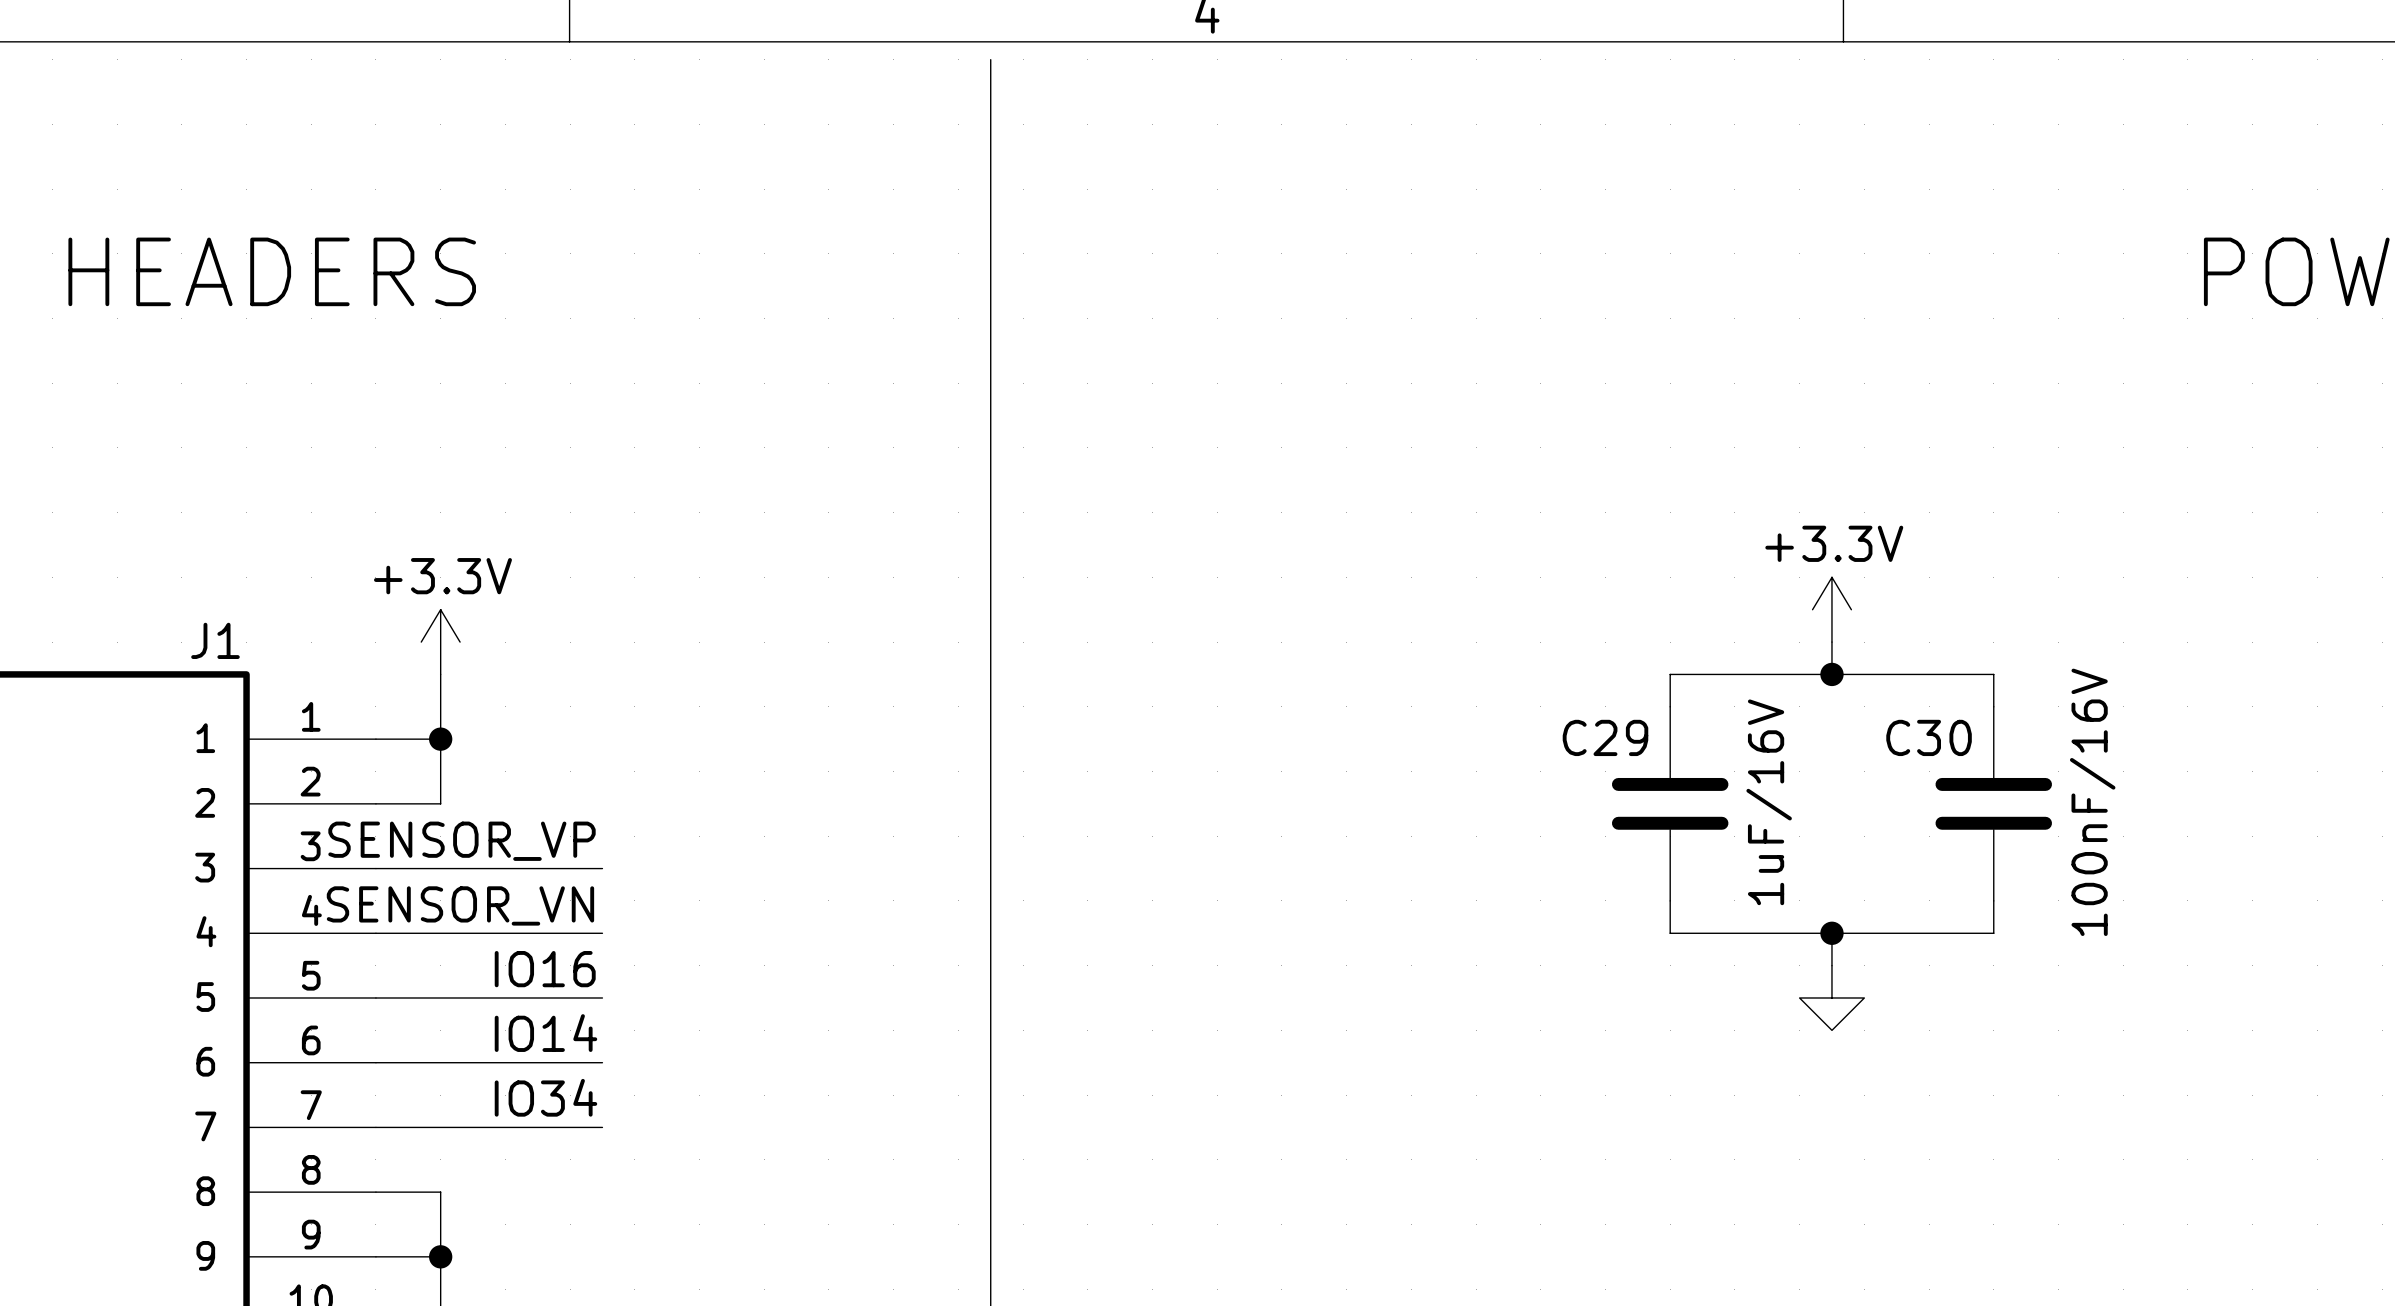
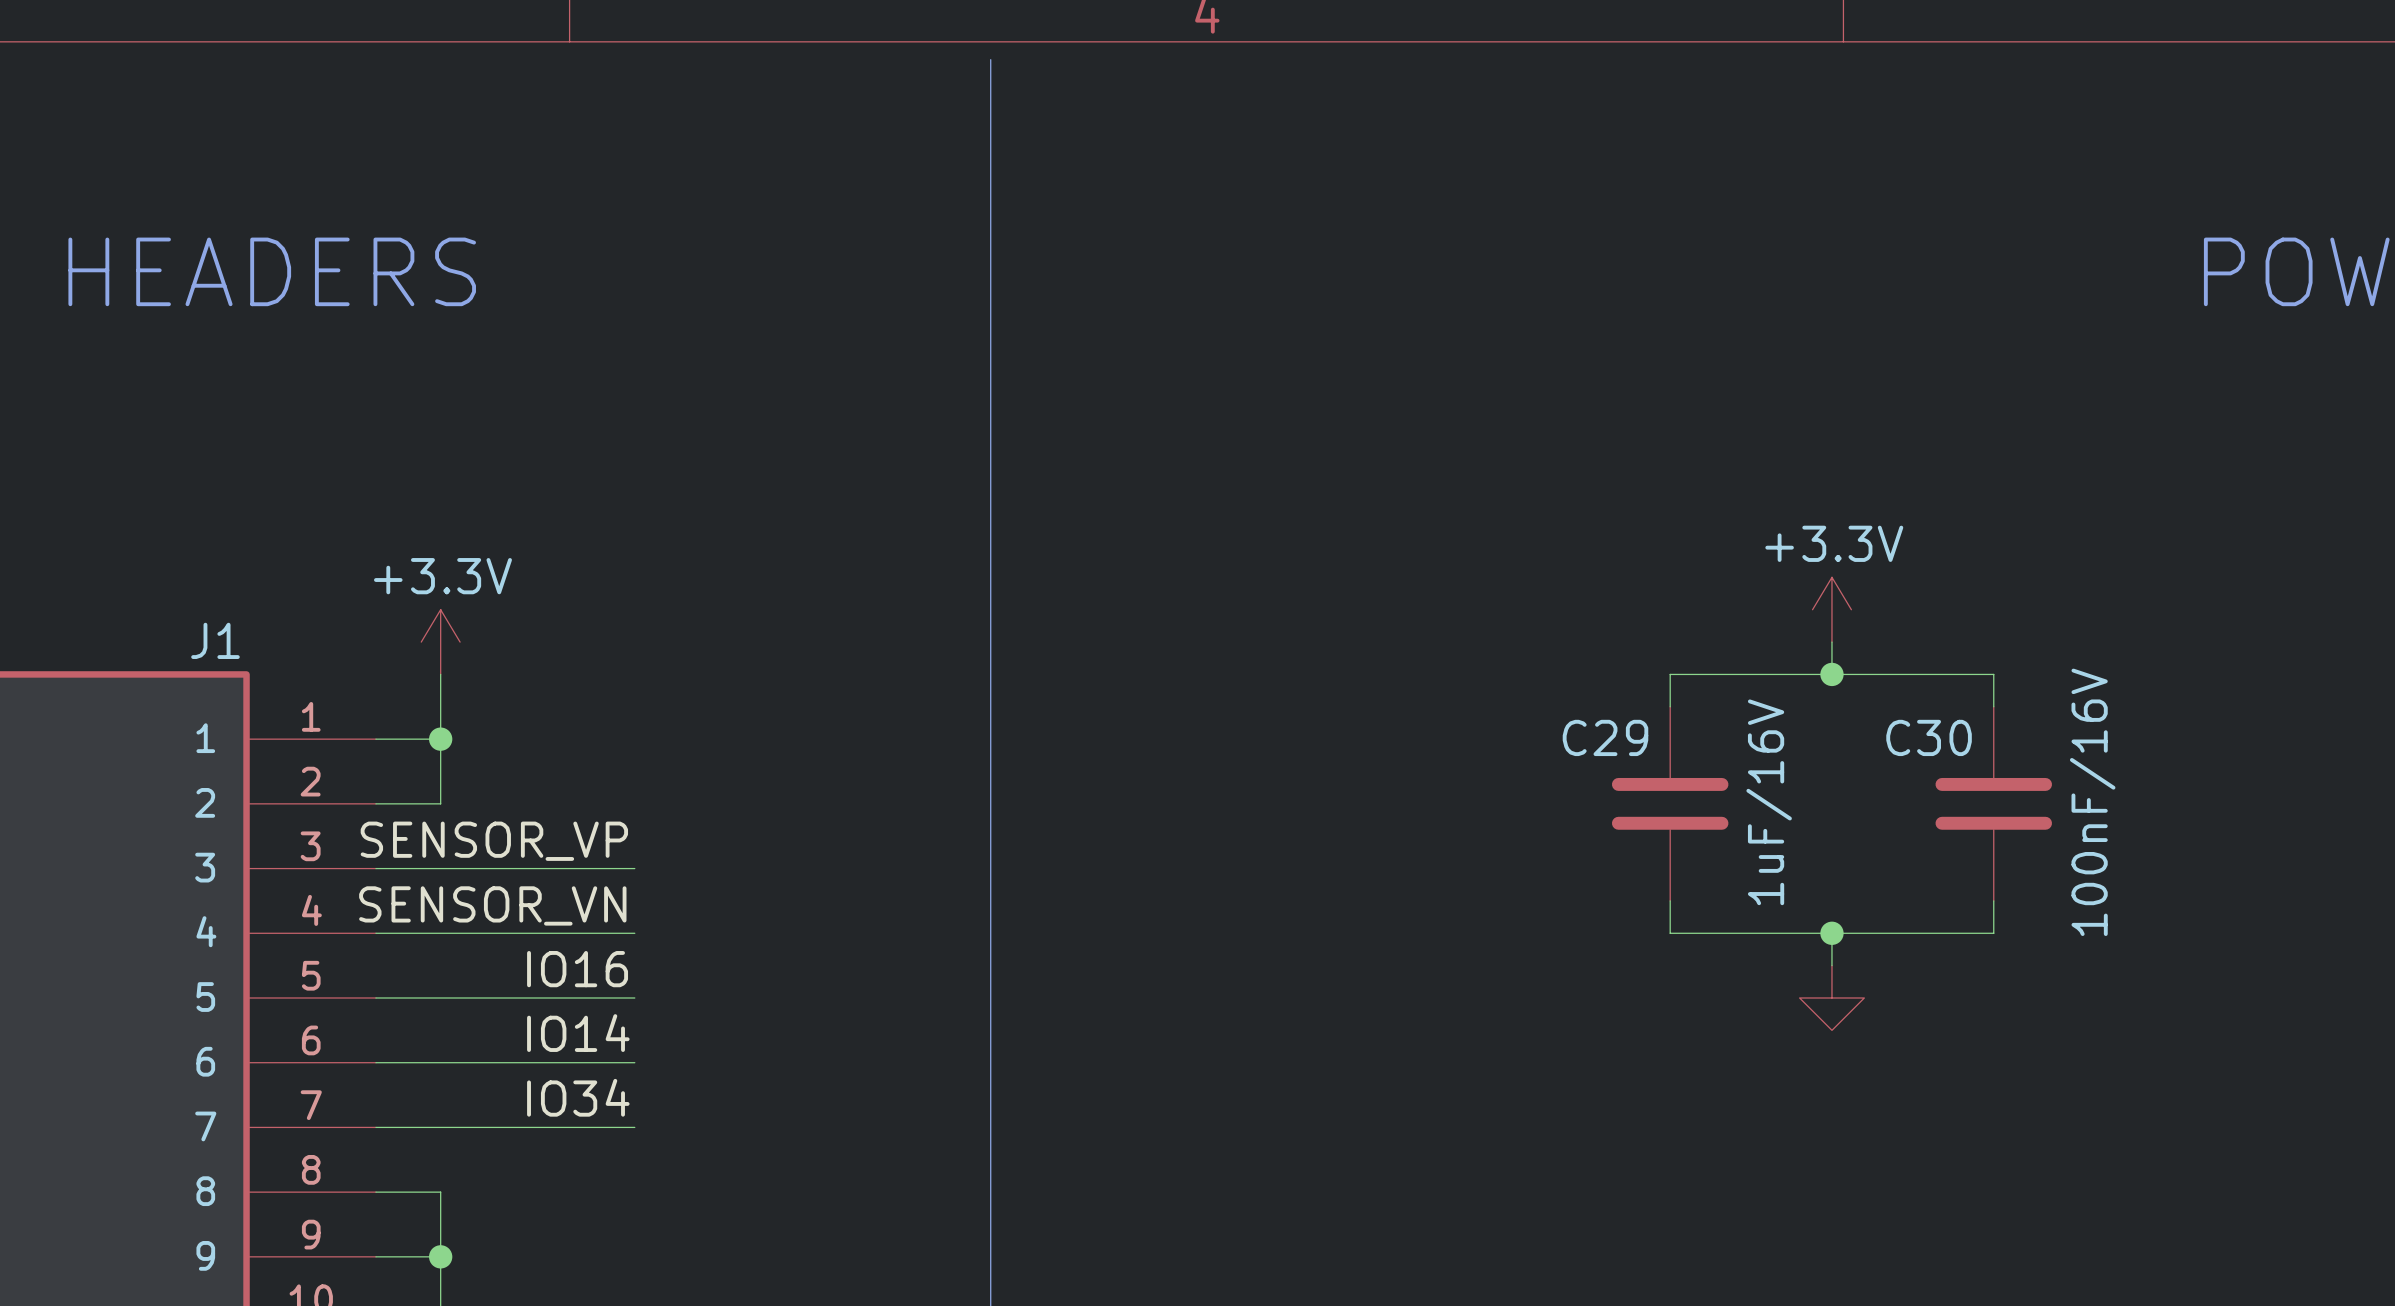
label position: SENSOR_VP (462, 841) -> SENSOR_VP (494, 841)
wire: none -> (602, 868) (634, 868)
label position: SENSOR_VN (460, 905) -> SENSOR_VN (492, 905)
wire: none -> (602, 933) (634, 933)
label position: IO16 (545, 969) -> IO16 (577, 969)
wire: none -> (602, 997) (634, 997)
label position: IO14 (545, 1033) -> IO14 (578, 1033)
wire: none -> (602, 1062) (634, 1062)
label position: IO34 (545, 1097) -> IO34 (578, 1097)
wire: none -> (602, 1127) (634, 1127)

